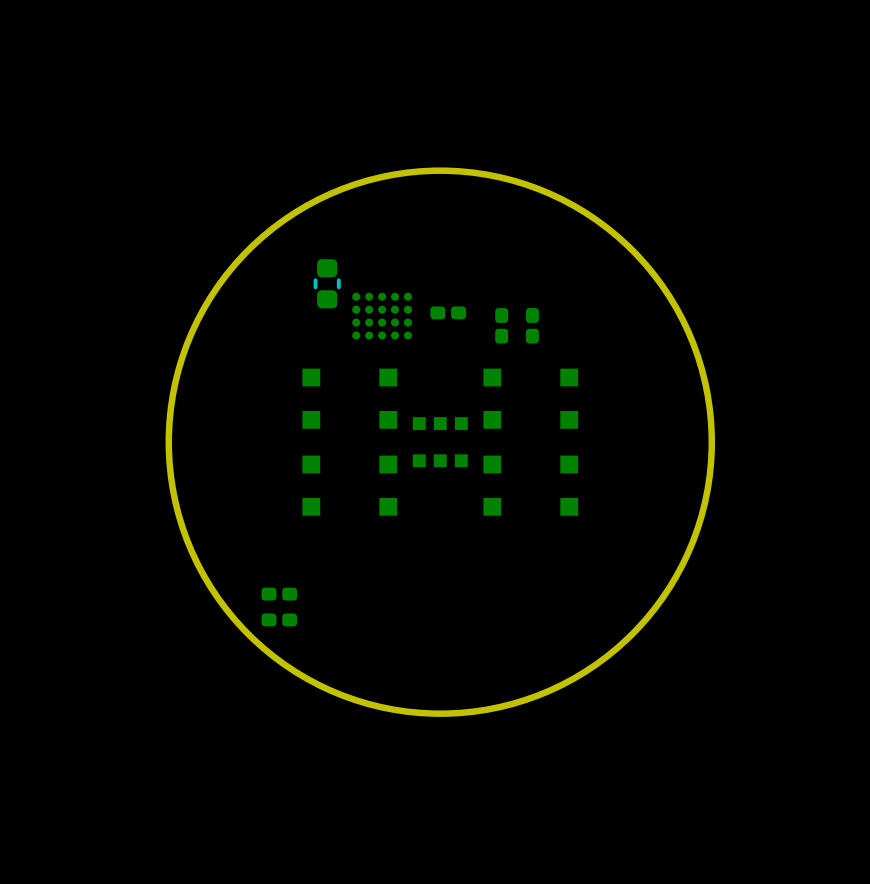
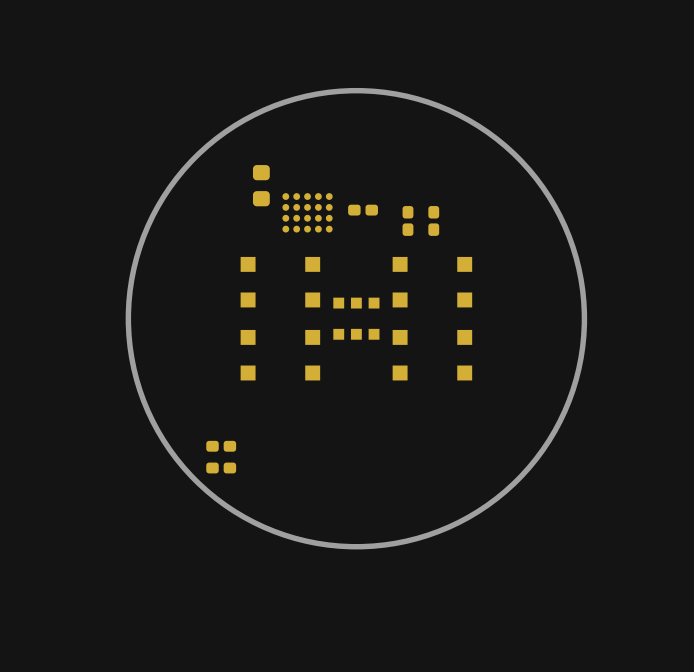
part footprint: [313, 259, 341, 309] -> [252, 165, 270, 207]

